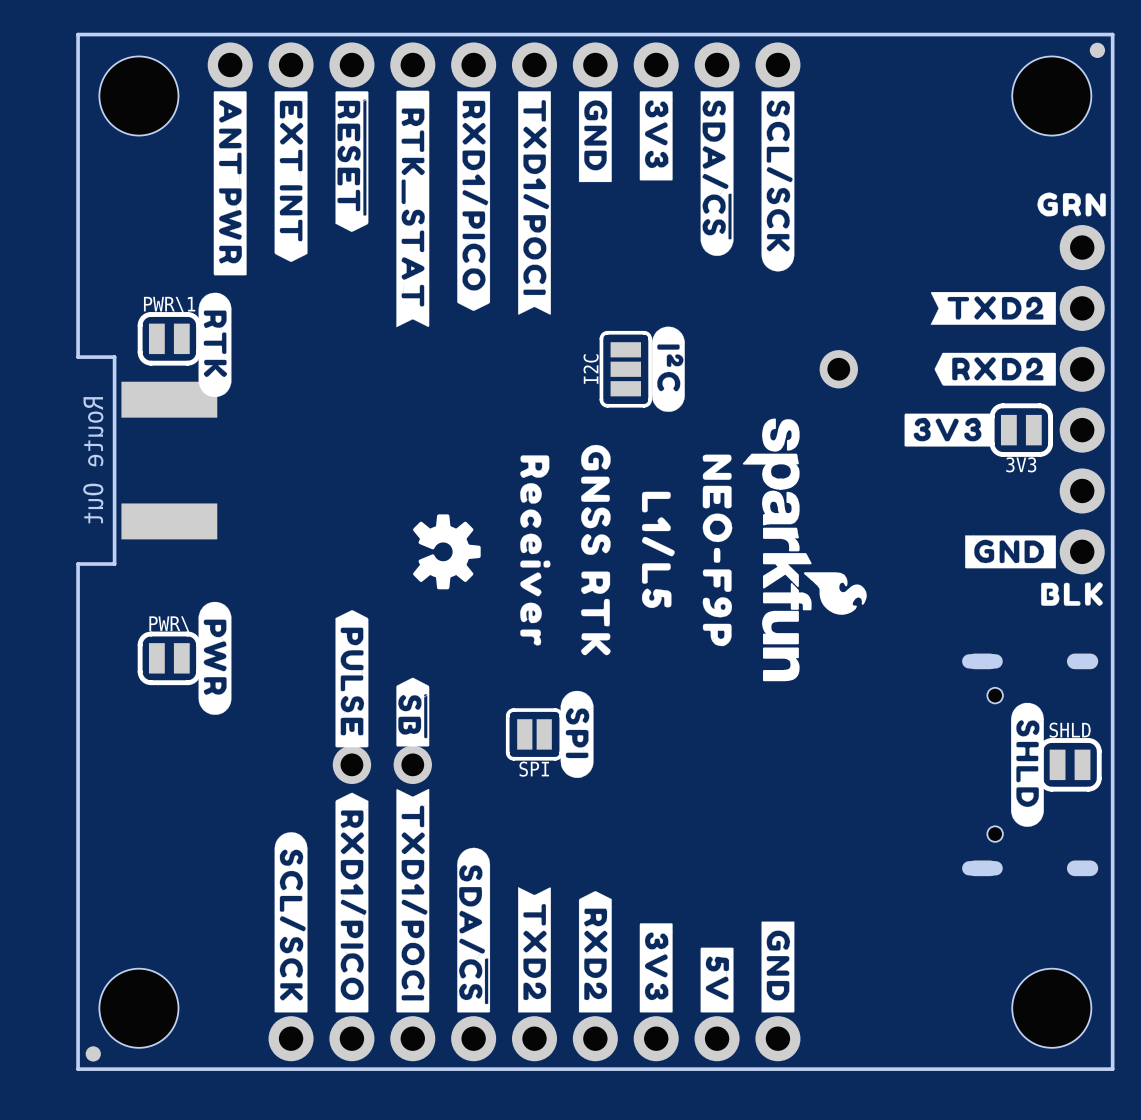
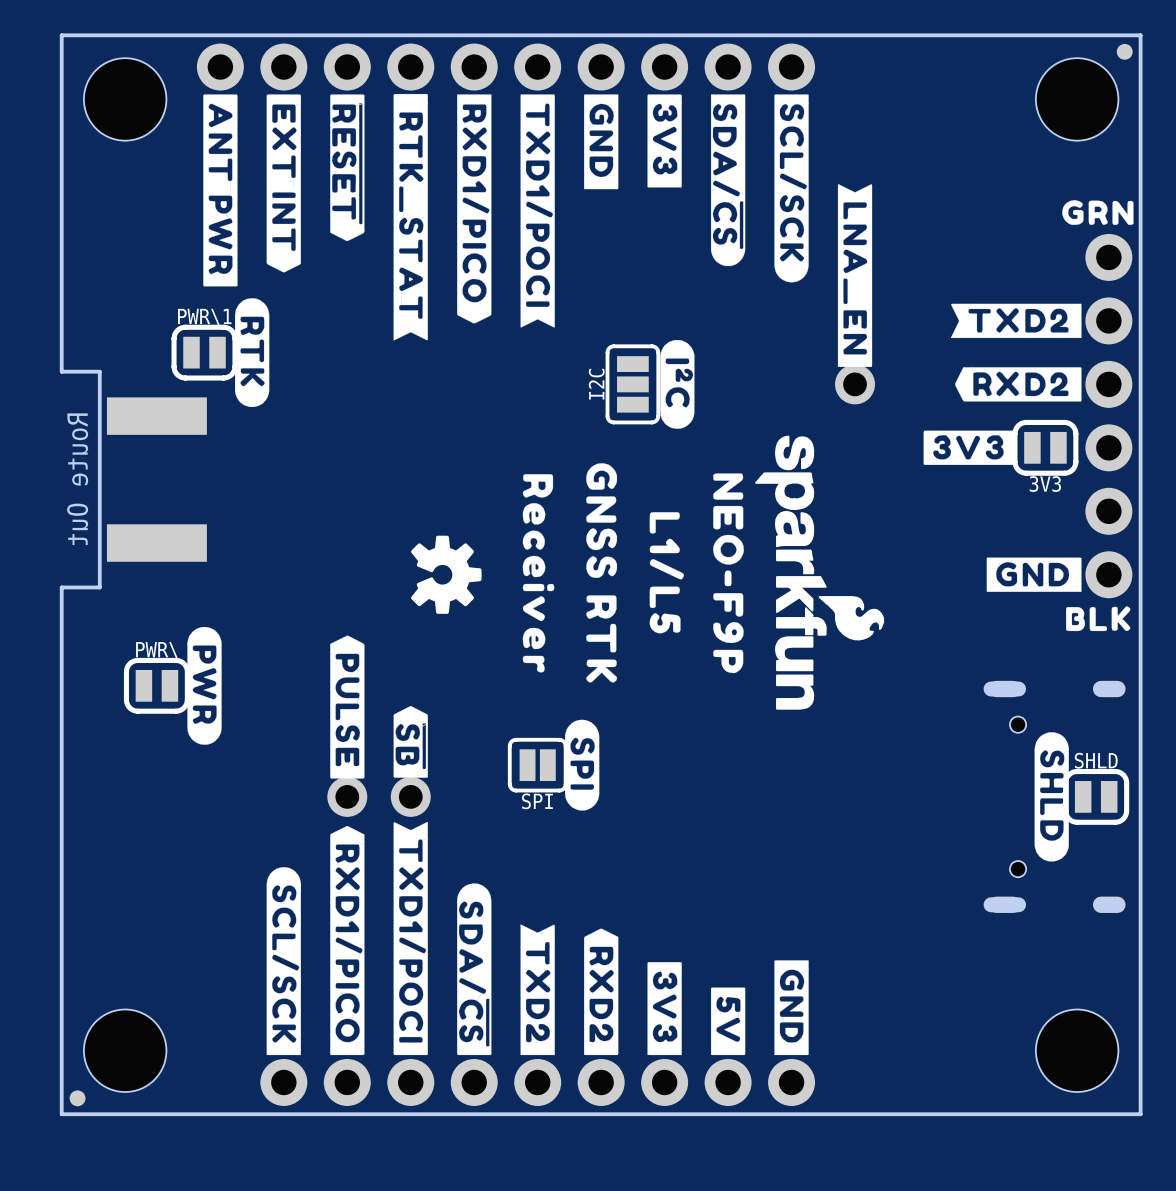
drawing: none -> [837, 184, 873, 367]
PWR\1 position: (169, 338) -> (204, 352)
drawing position: (215, 344) -> (252, 352)

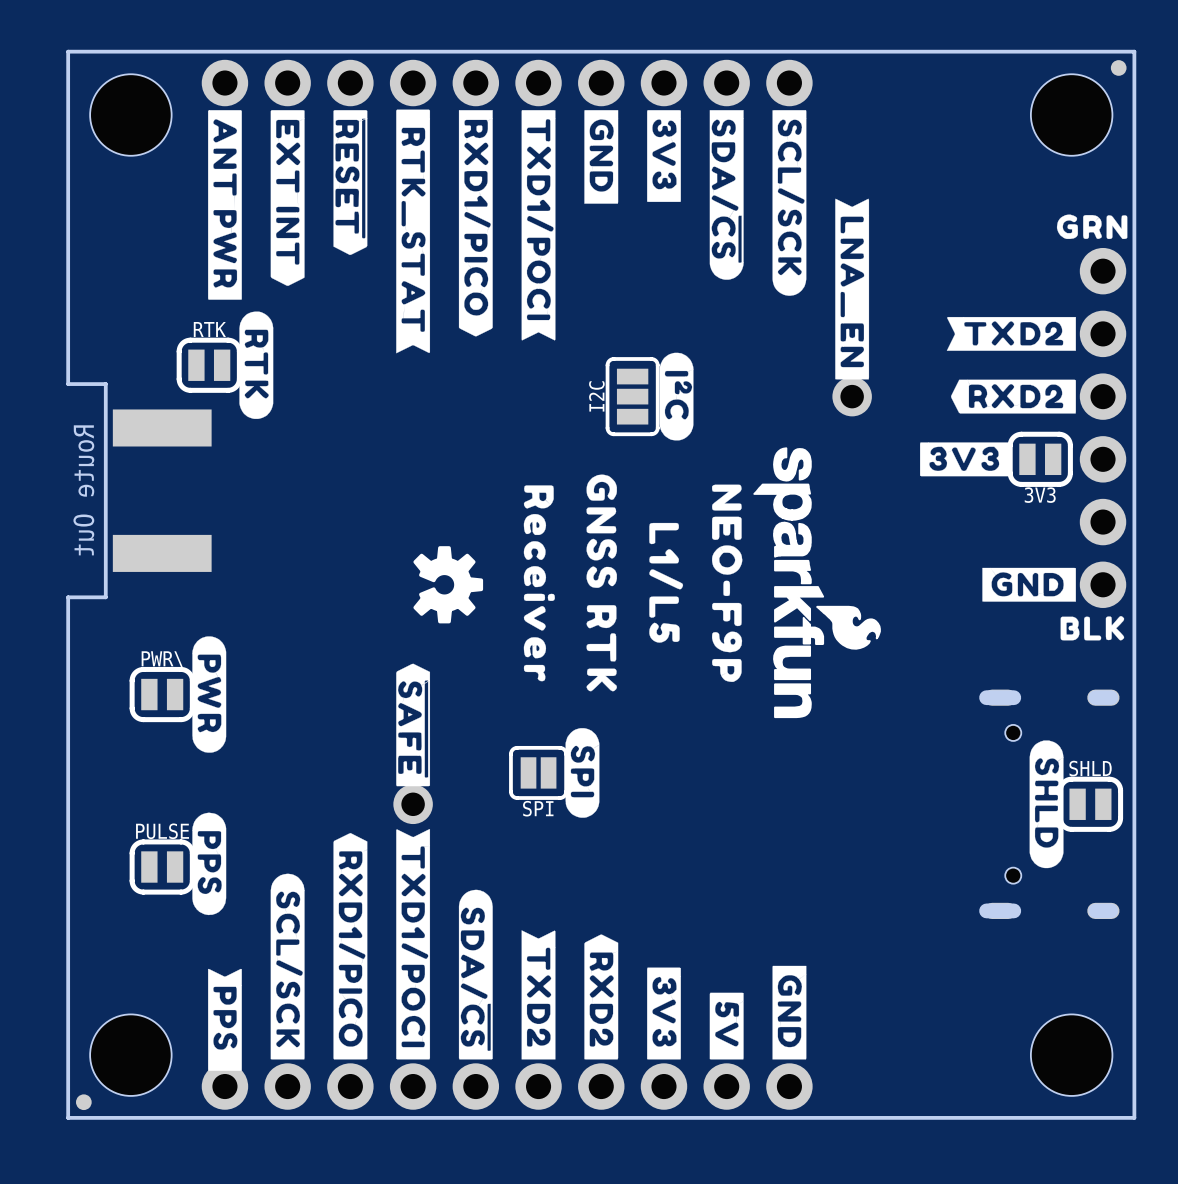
PWR\1 name: PWR\1 (204, 317) -> RTK (209, 329)
drawing: [330, 635, 428, 779] -> none
drawing: none -> [396, 663, 431, 787]
part: (347, 796) -> none
drawing: none -> [192, 812, 227, 916]
PULSE: none -> (162, 867)
drawing: none -> [208, 968, 242, 1071]
part: none -> (507, 1086)

